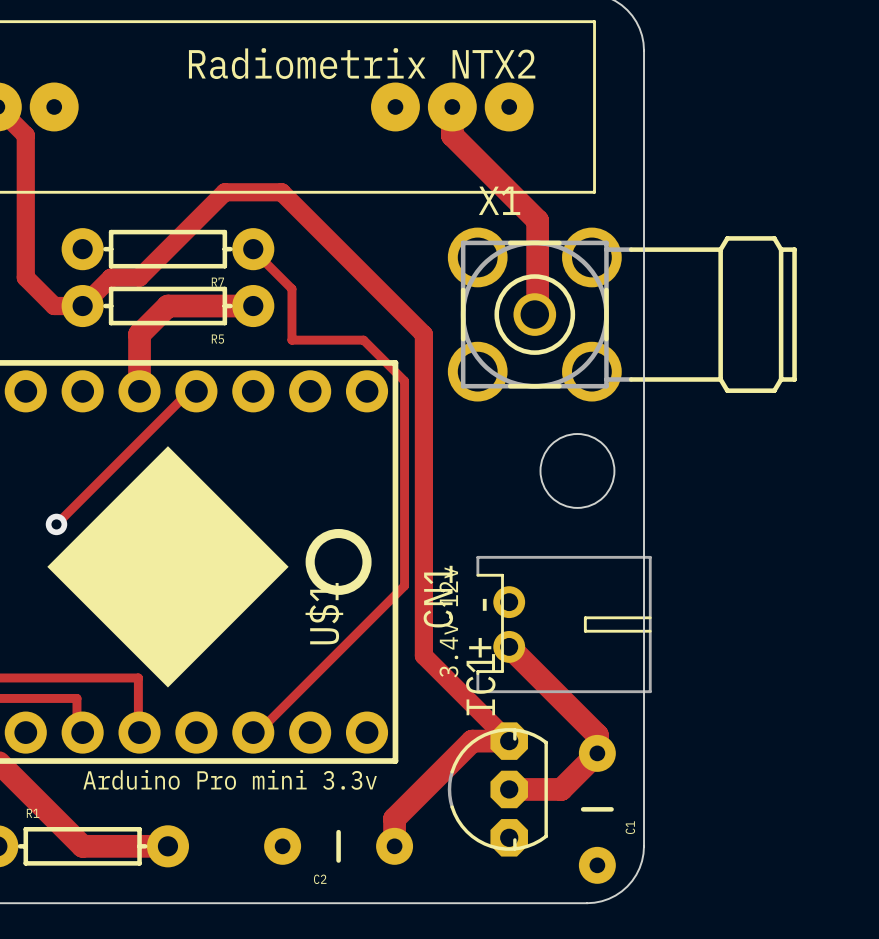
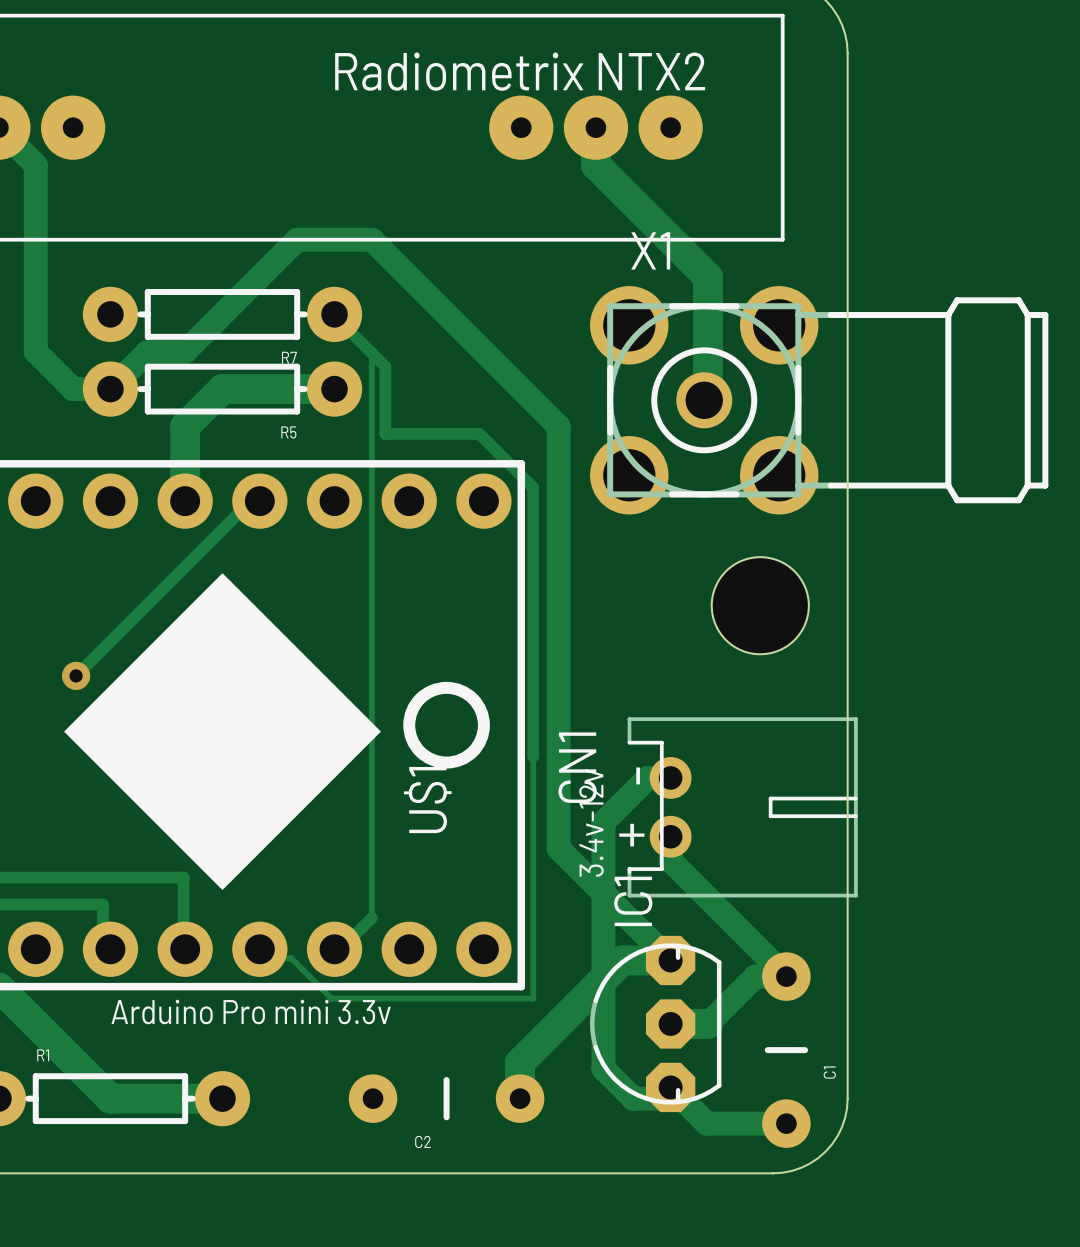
track: none -> (371, 353) (371, 917)
track: (404, 585) (281, 708) -> (533, 756) (533, 998) (331, 998) (291, 958) (264, 958) (259, 949)
track: none -> (670, 777) (647, 777) (603, 822) (603, 1068) (633, 1098) (659, 1098) (670, 1087) (706, 1123) (786, 1123)
track: (509, 646) (597, 735) (597, 753) (561, 789) (537, 789) -> (670, 836) (670, 860) (786, 976) (755, 976) (707, 1023)

